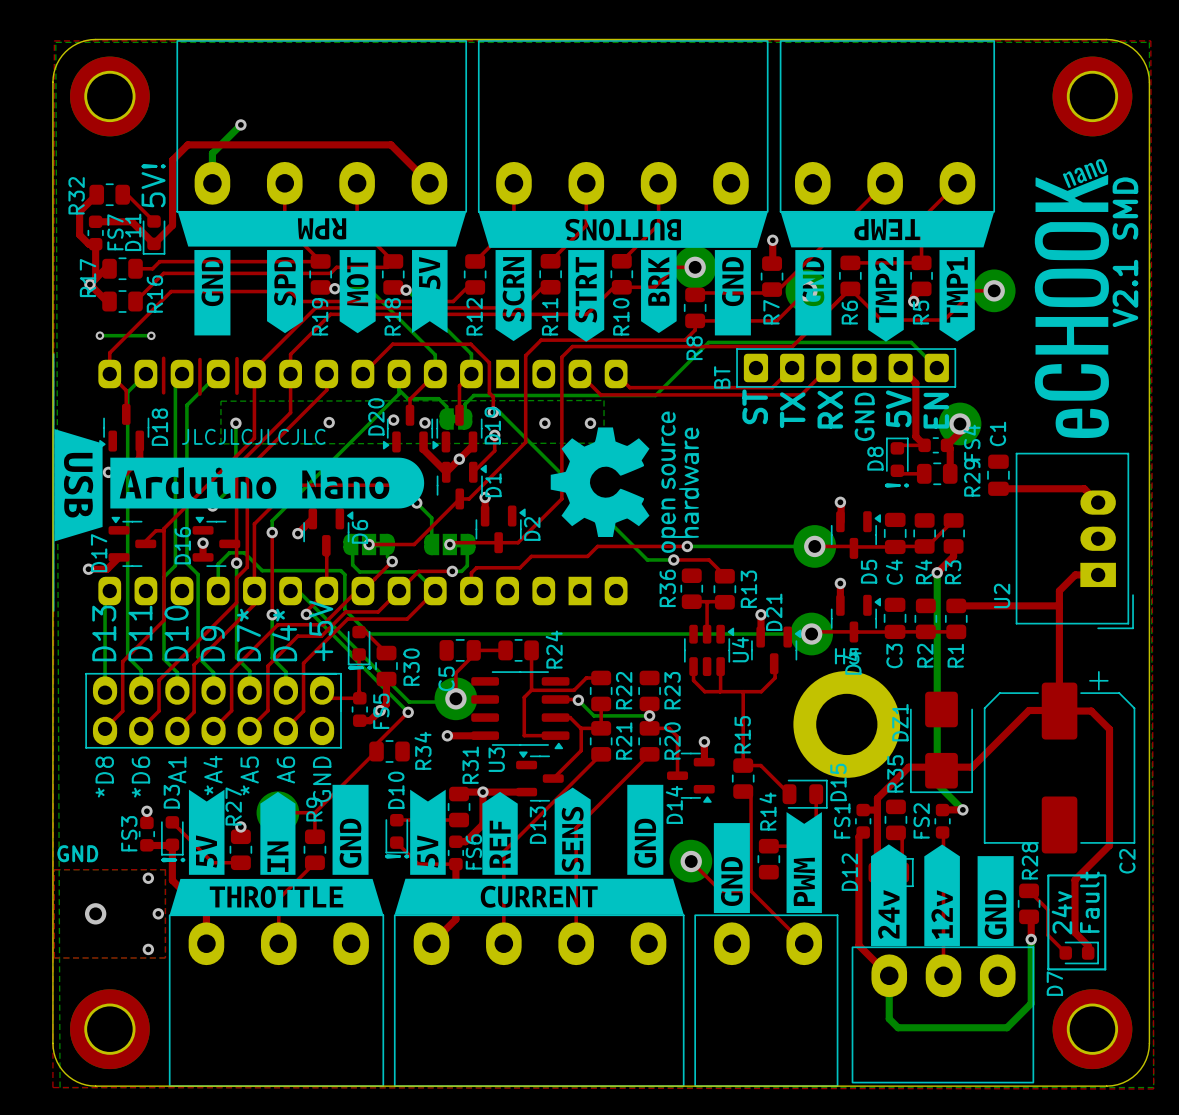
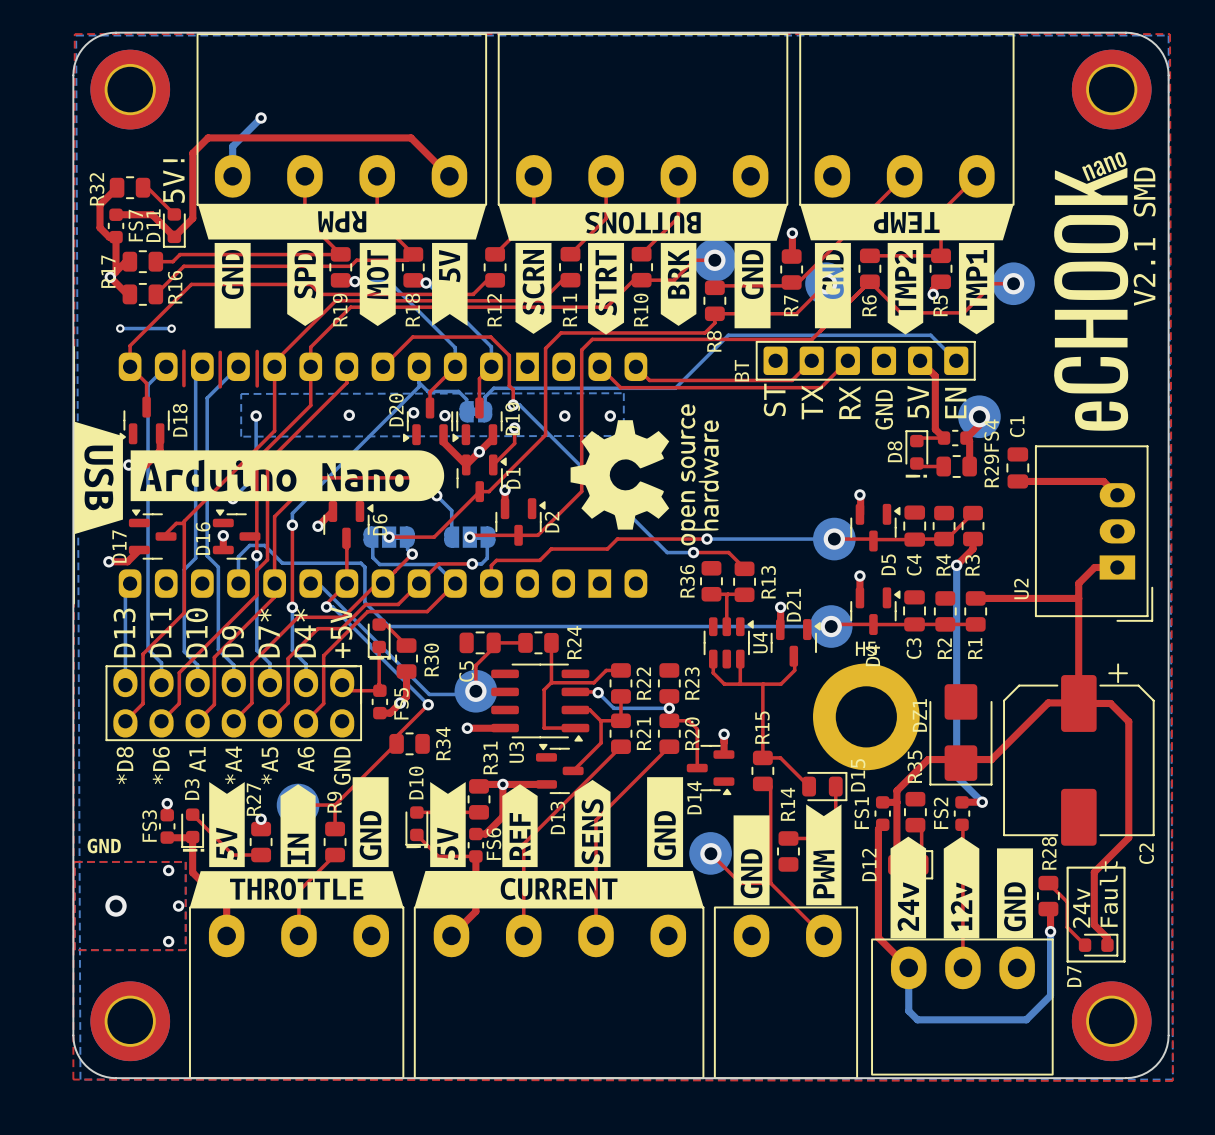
text: JLCJLCJLCJLC (253, 436) -> none

